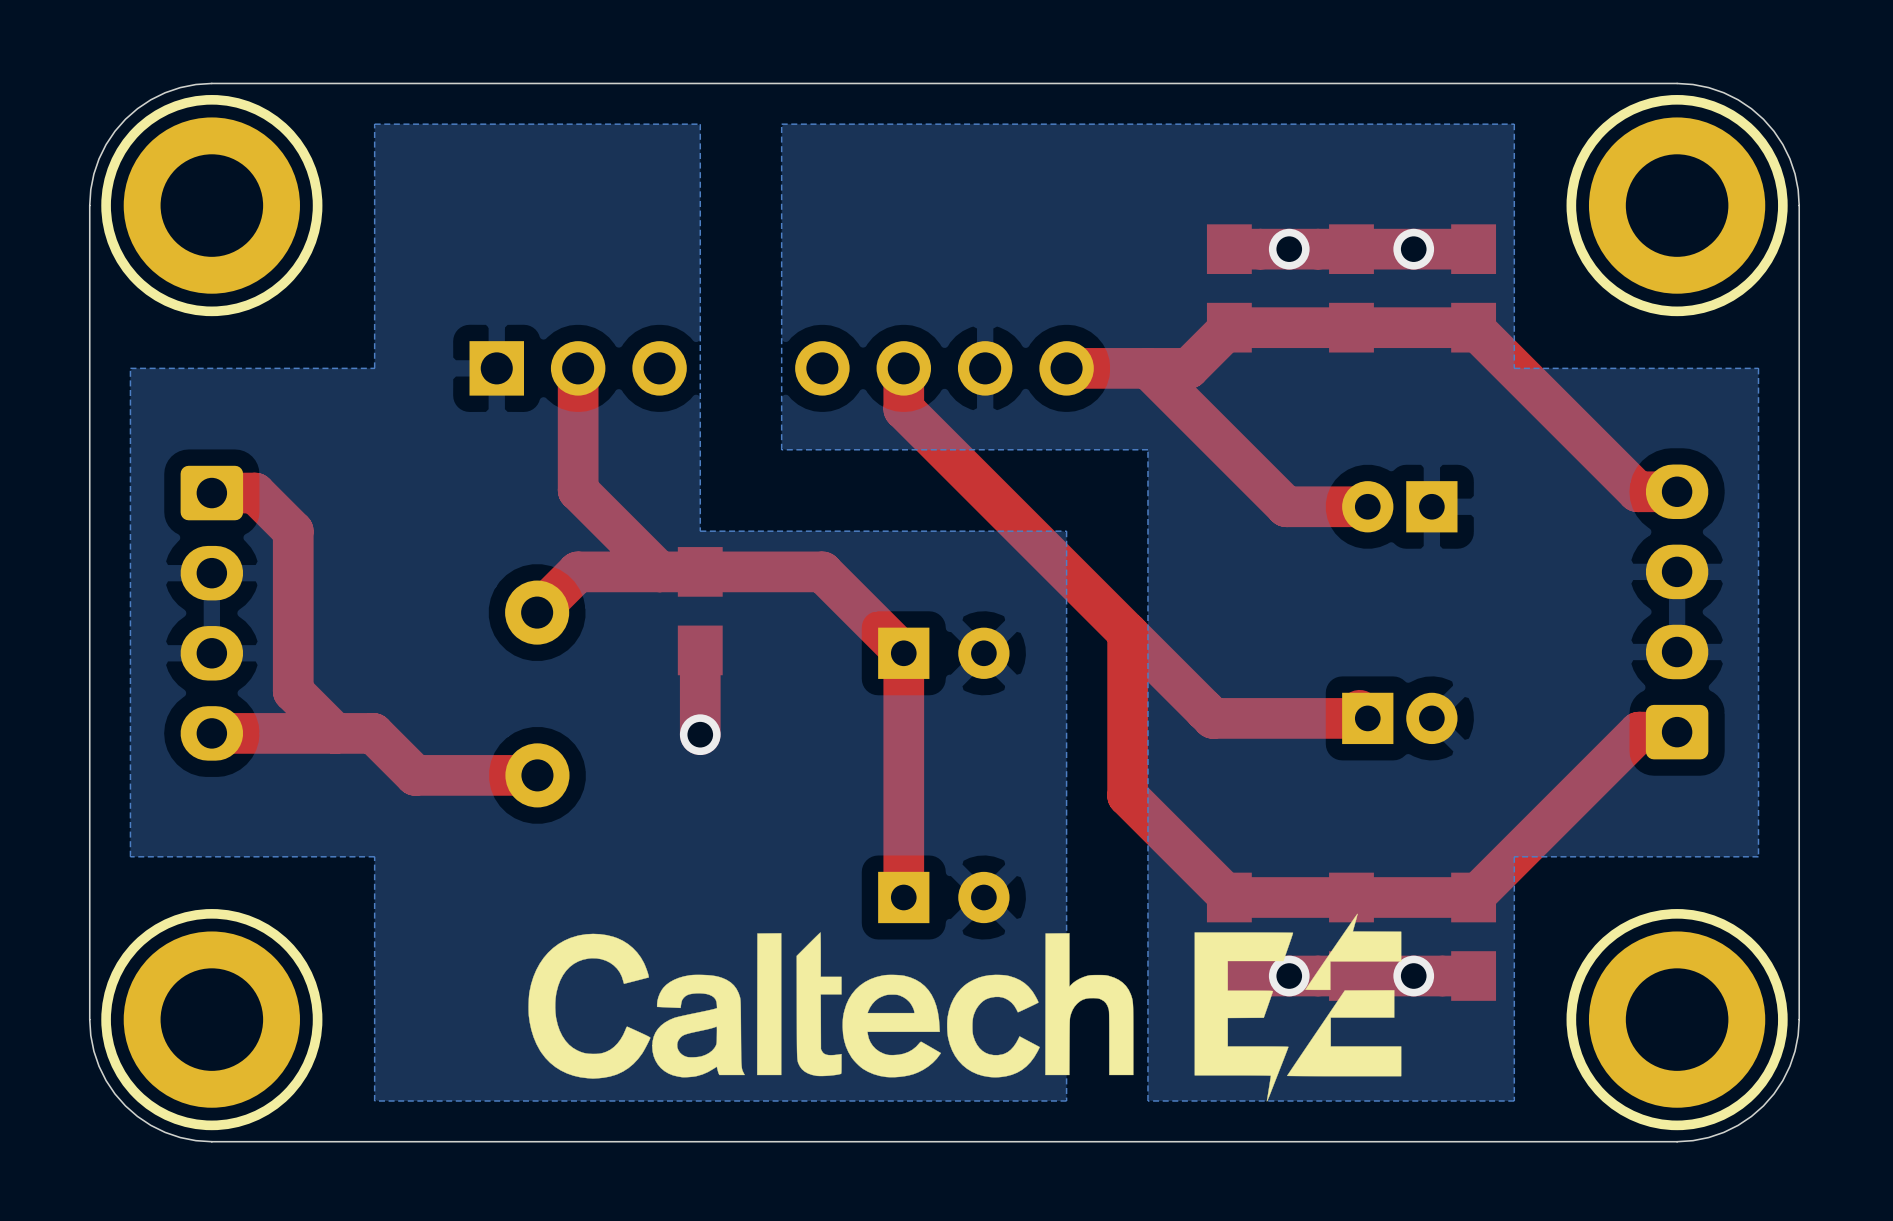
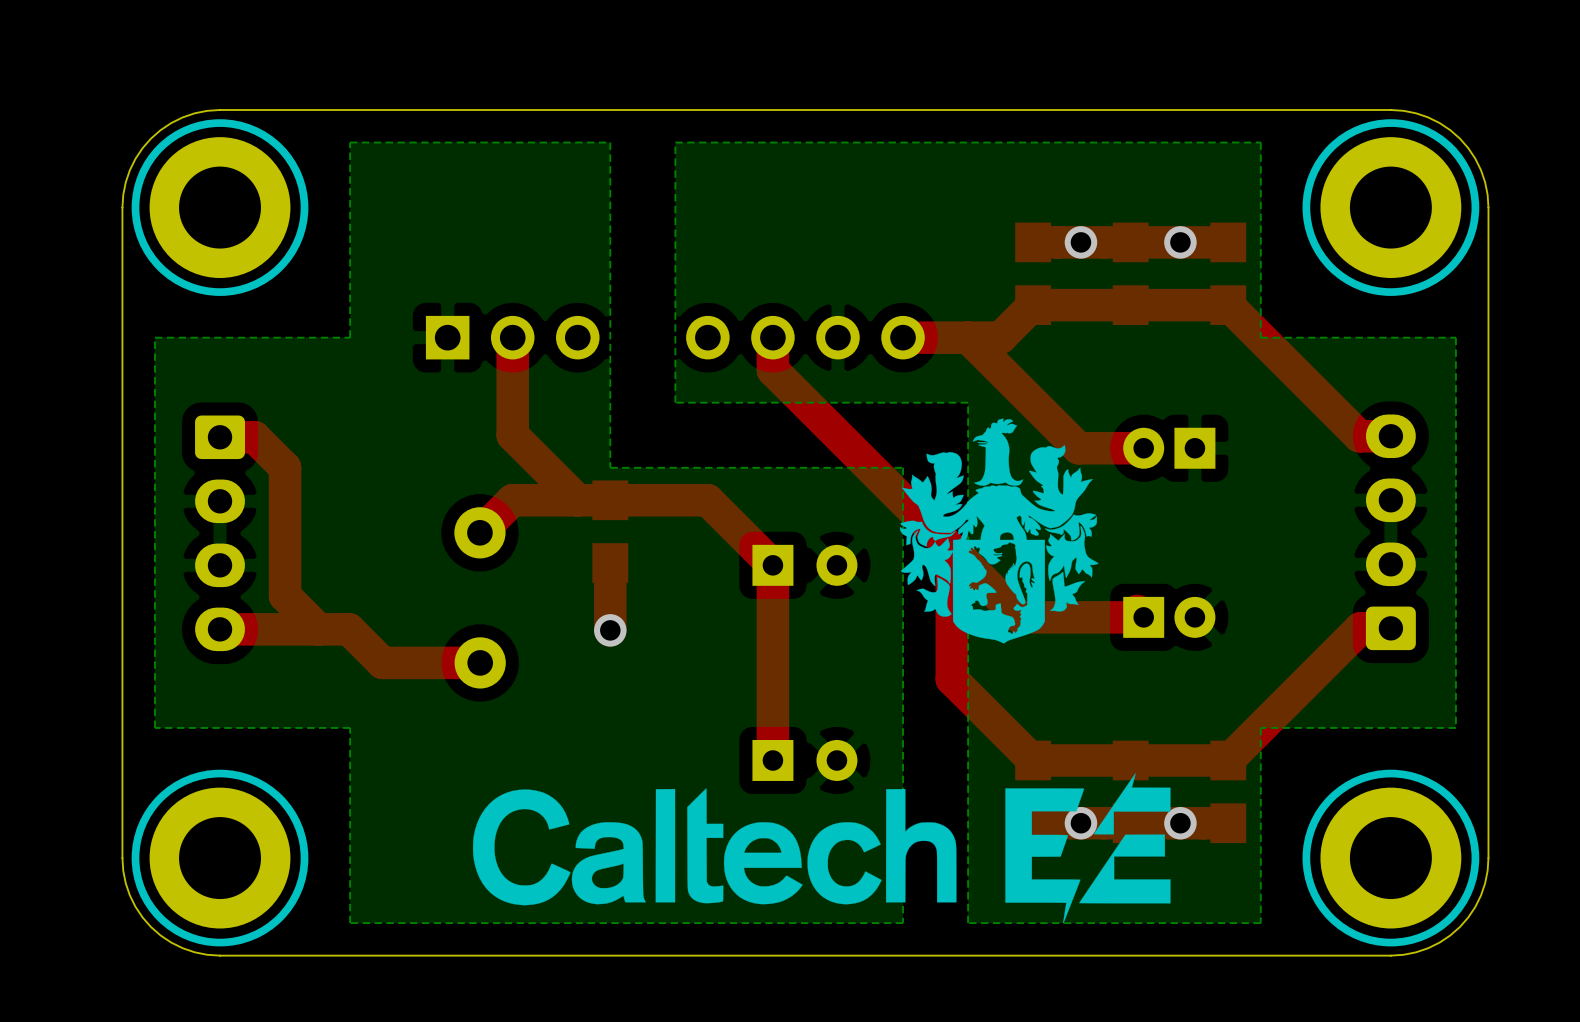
drawing: none -> [899, 418, 1099, 644]

